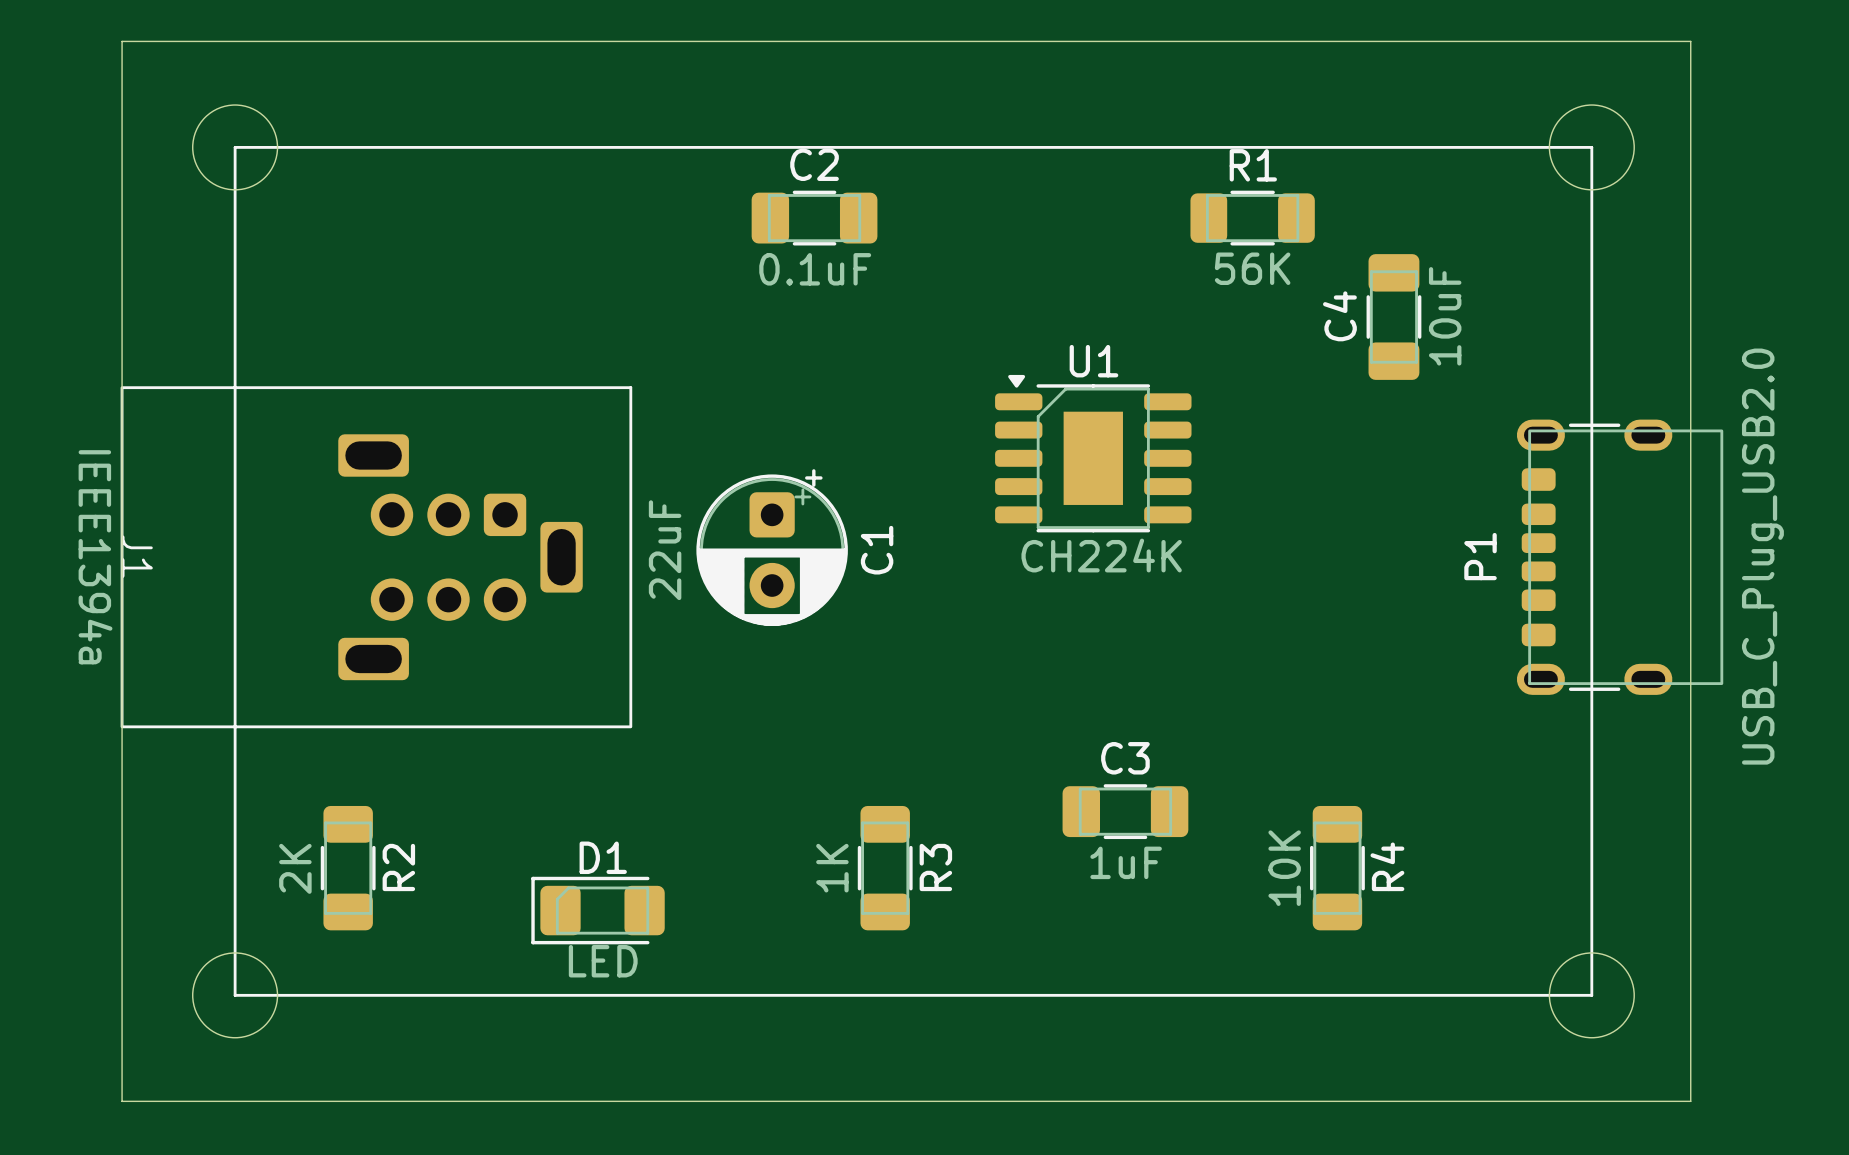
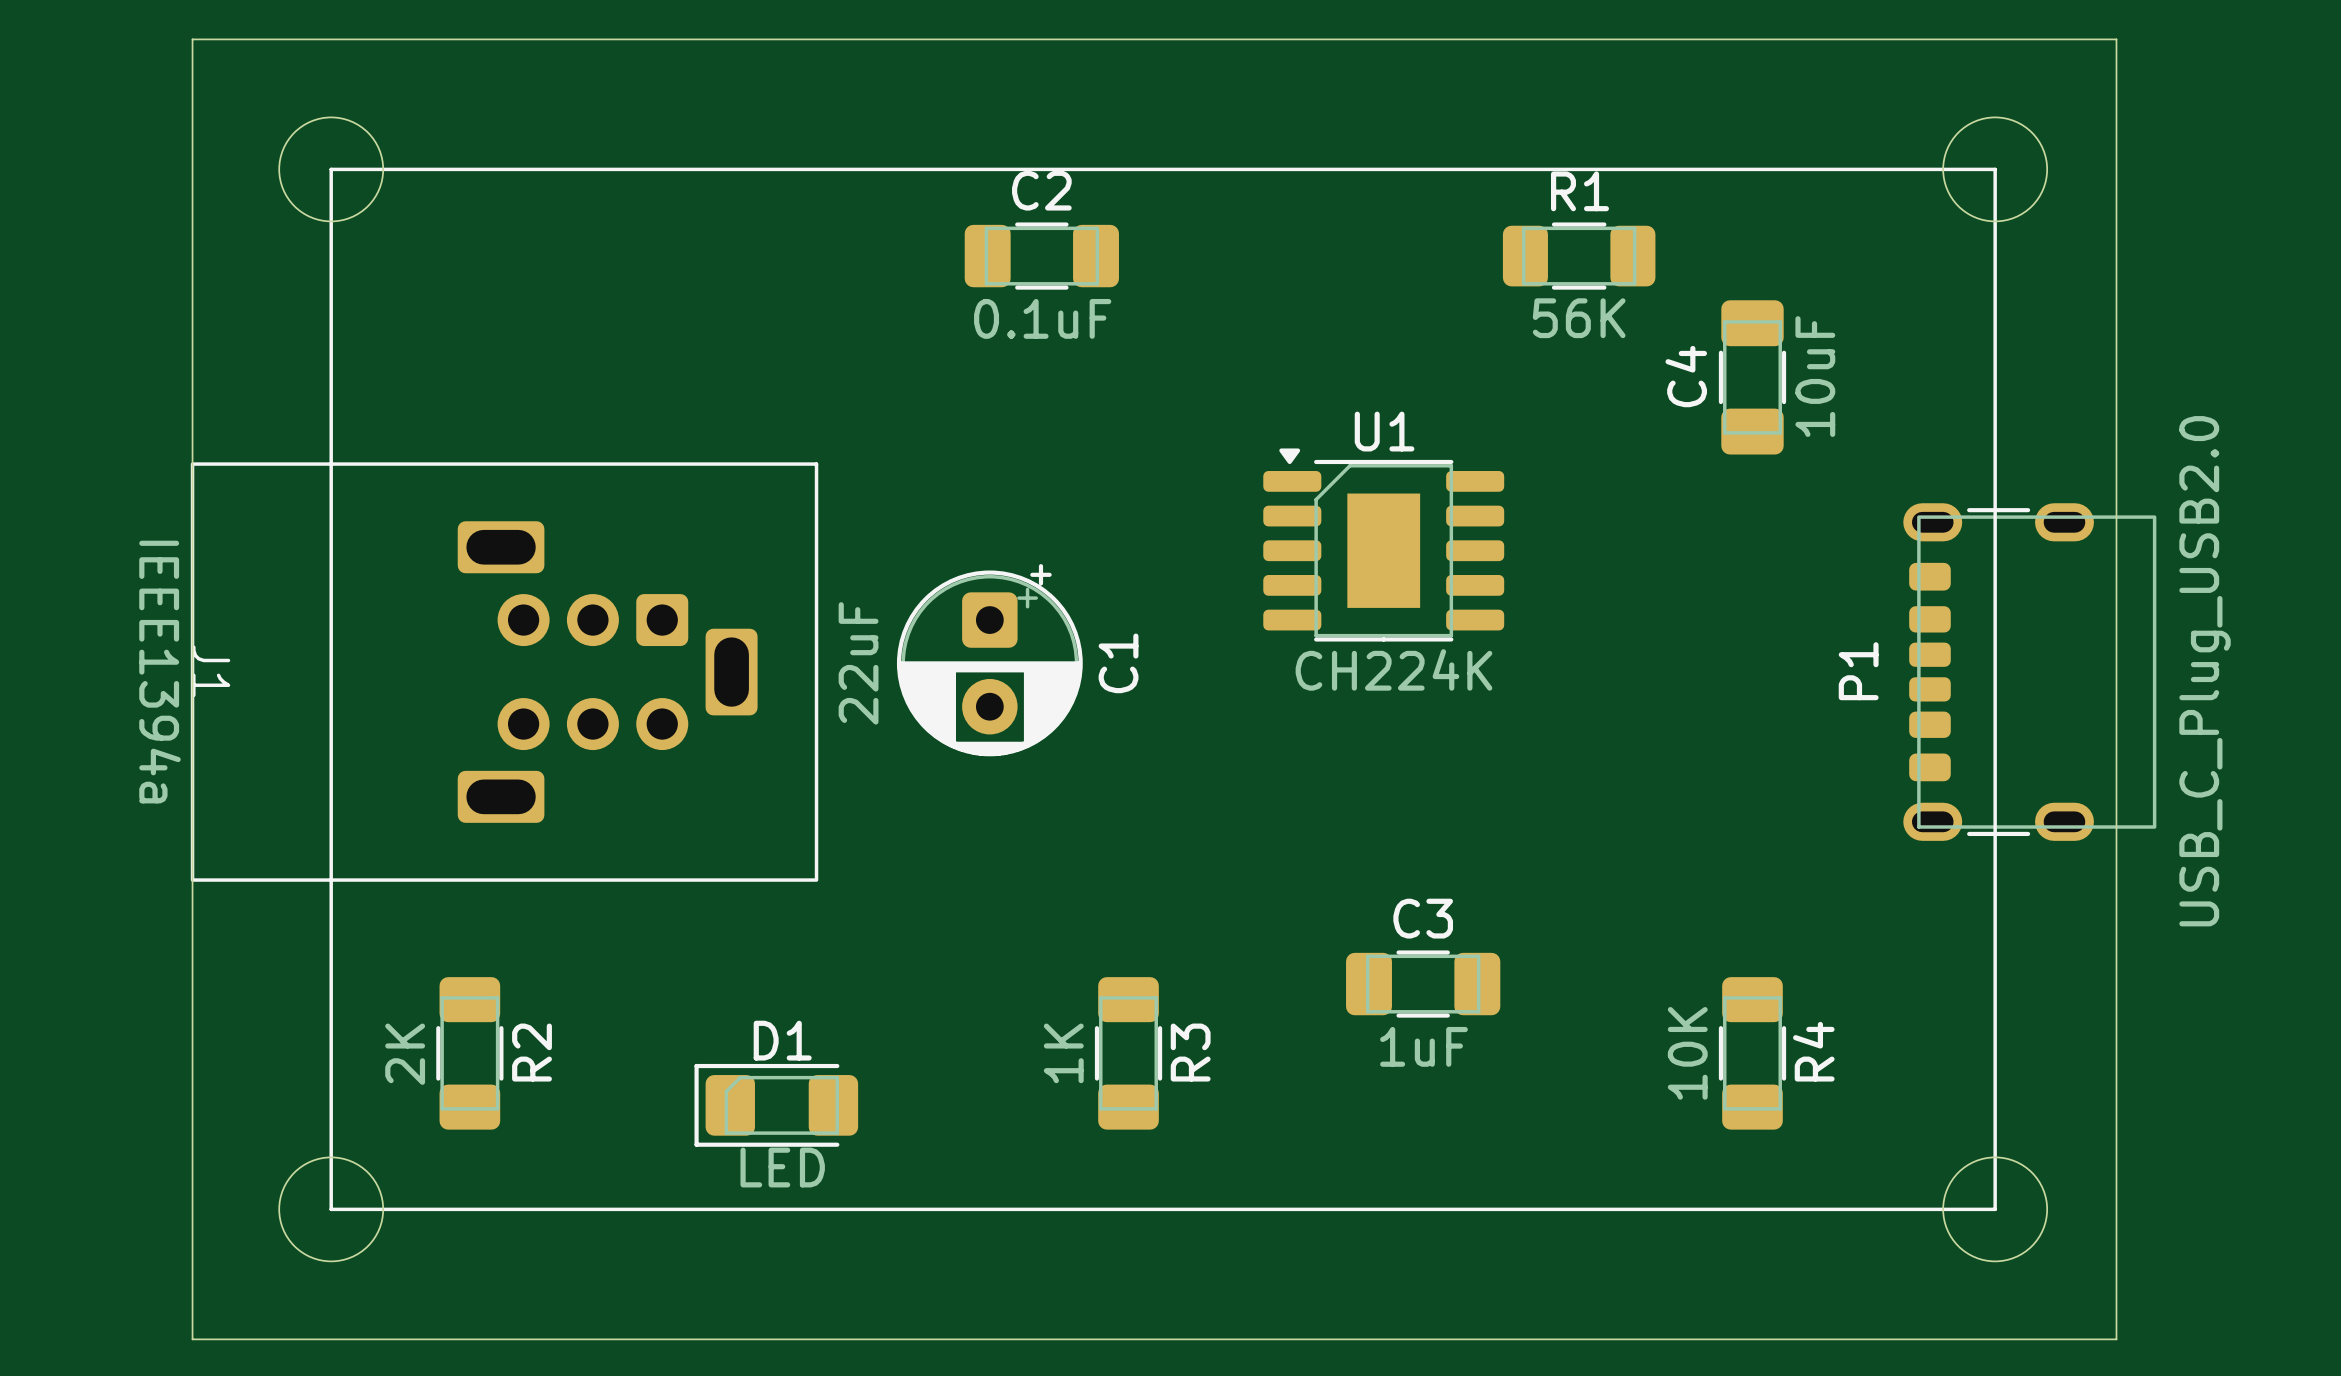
R4 position: (1337, 868) -> (1752, 1053)

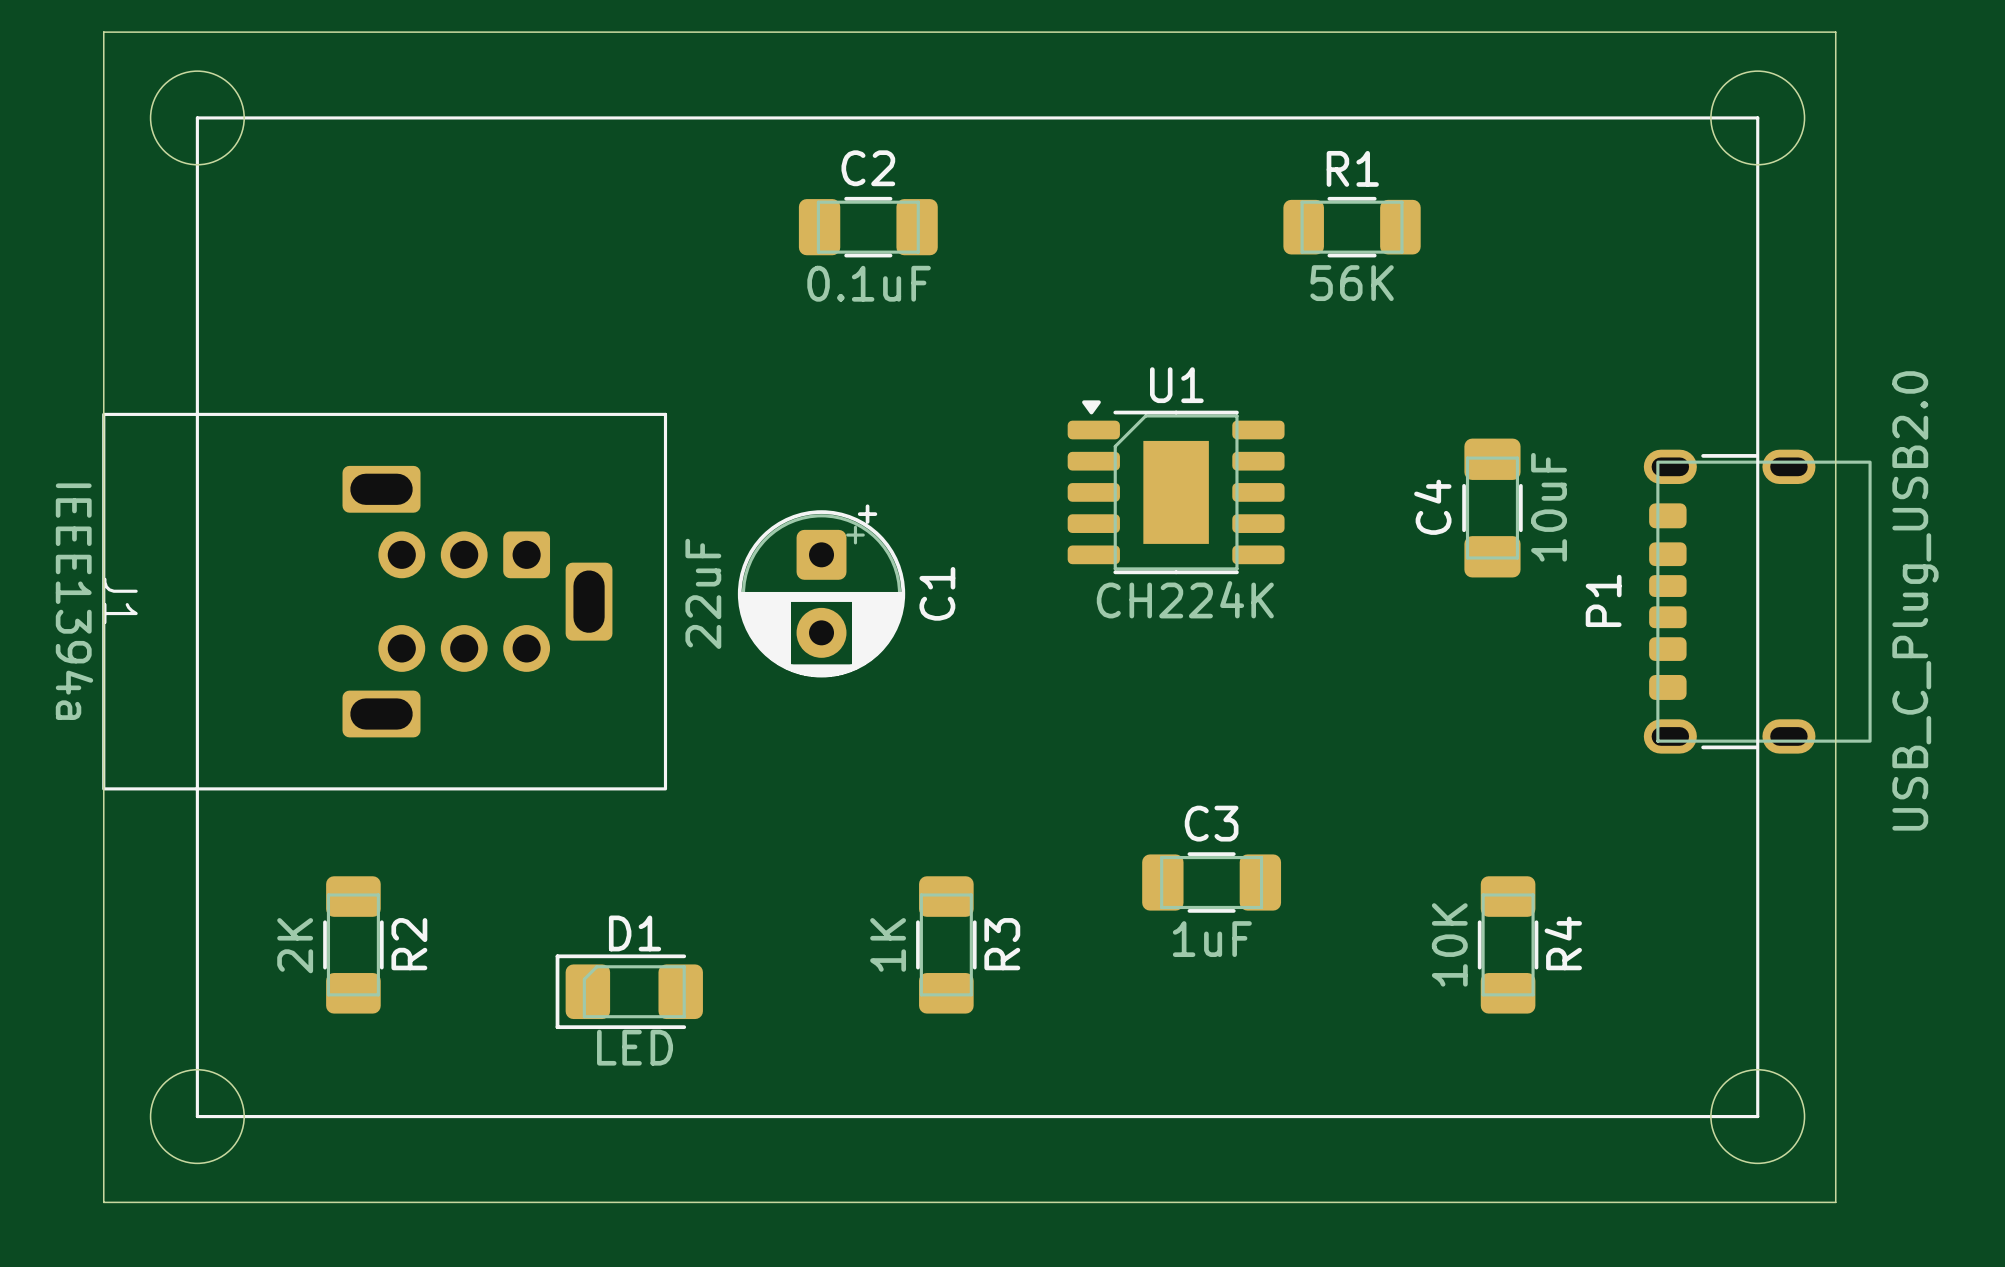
line: (331, 169) (1995, 169) (1995, 1209) (331, 1209) (331, 169) -> (197, 117) (197, 1116) (1757, 1116) (1757, 117) (197, 117)
round board edge position: (331, 169) -> (197, 117)
round board edge position: (1995, 169) -> (1757, 117)
C4 position: (1752, 377) -> (1492, 508)
round board edge position: (331, 1209) -> (197, 1116)
round board edge position: (1995, 1209) -> (1757, 1116)

